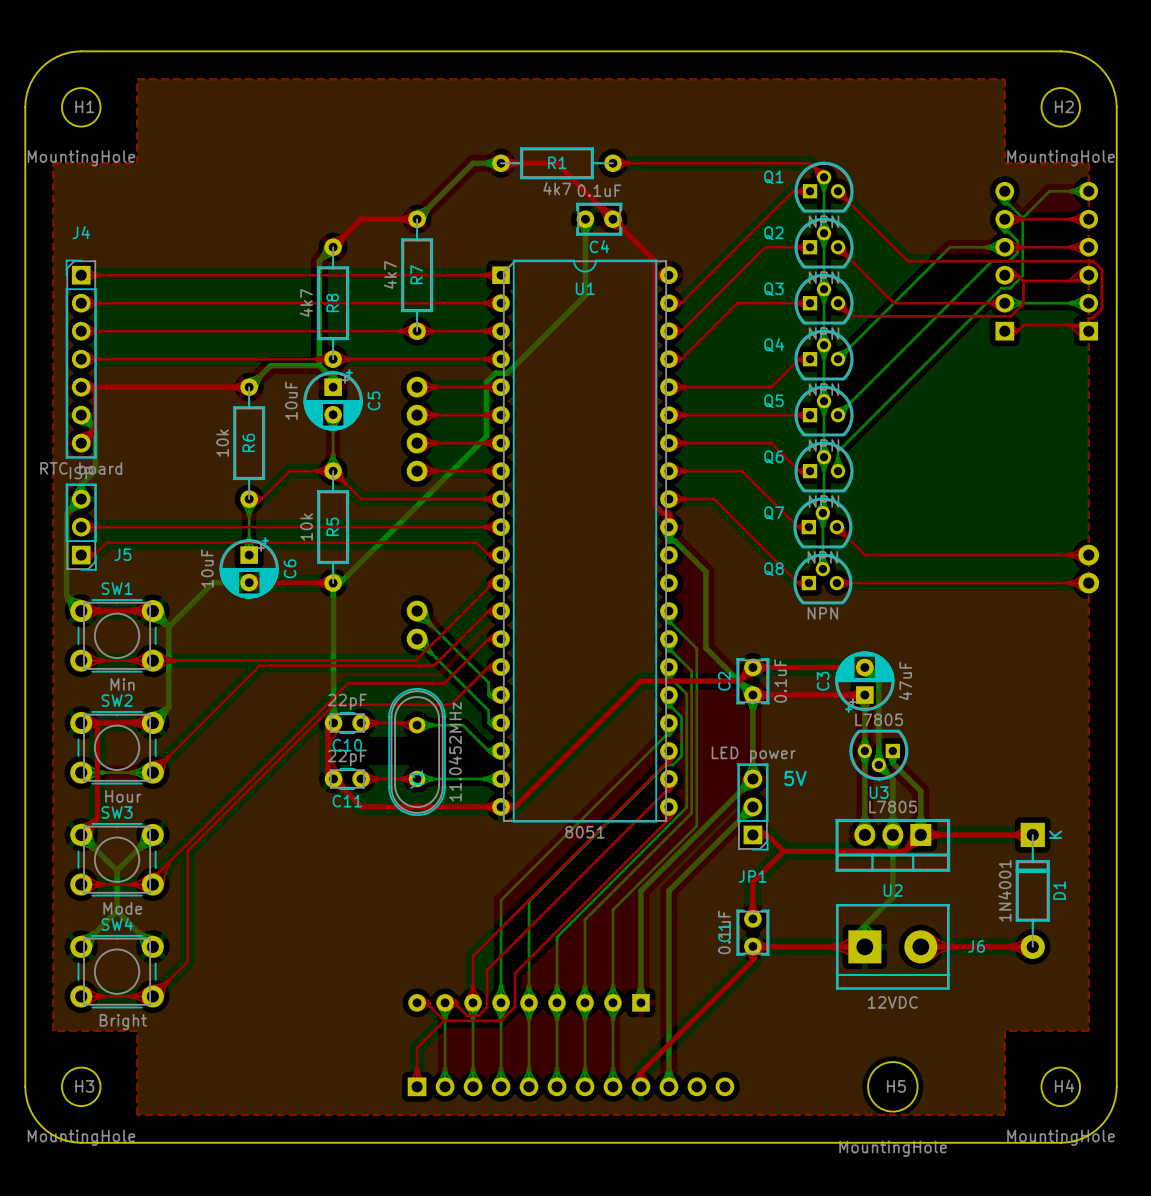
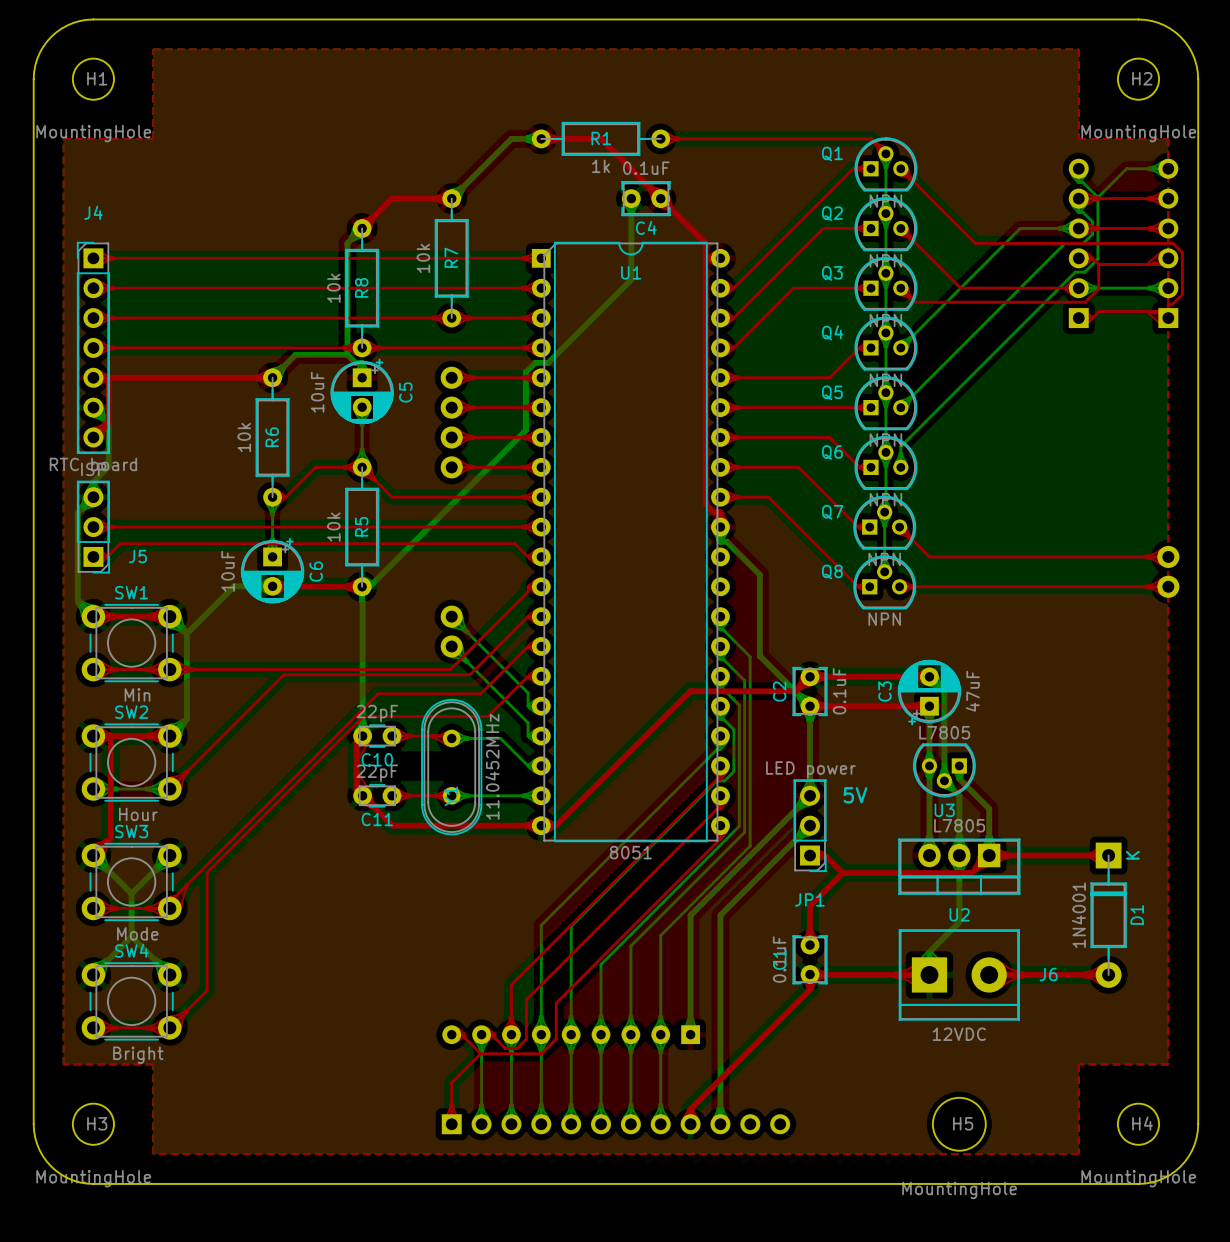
R1 value: 4k7 (557, 188) -> 1k (601, 166)
R7 value: 4k7 (390, 274) -> 10k (423, 258)
R8 value: 4k7 (306, 302) -> 10k (333, 288)

